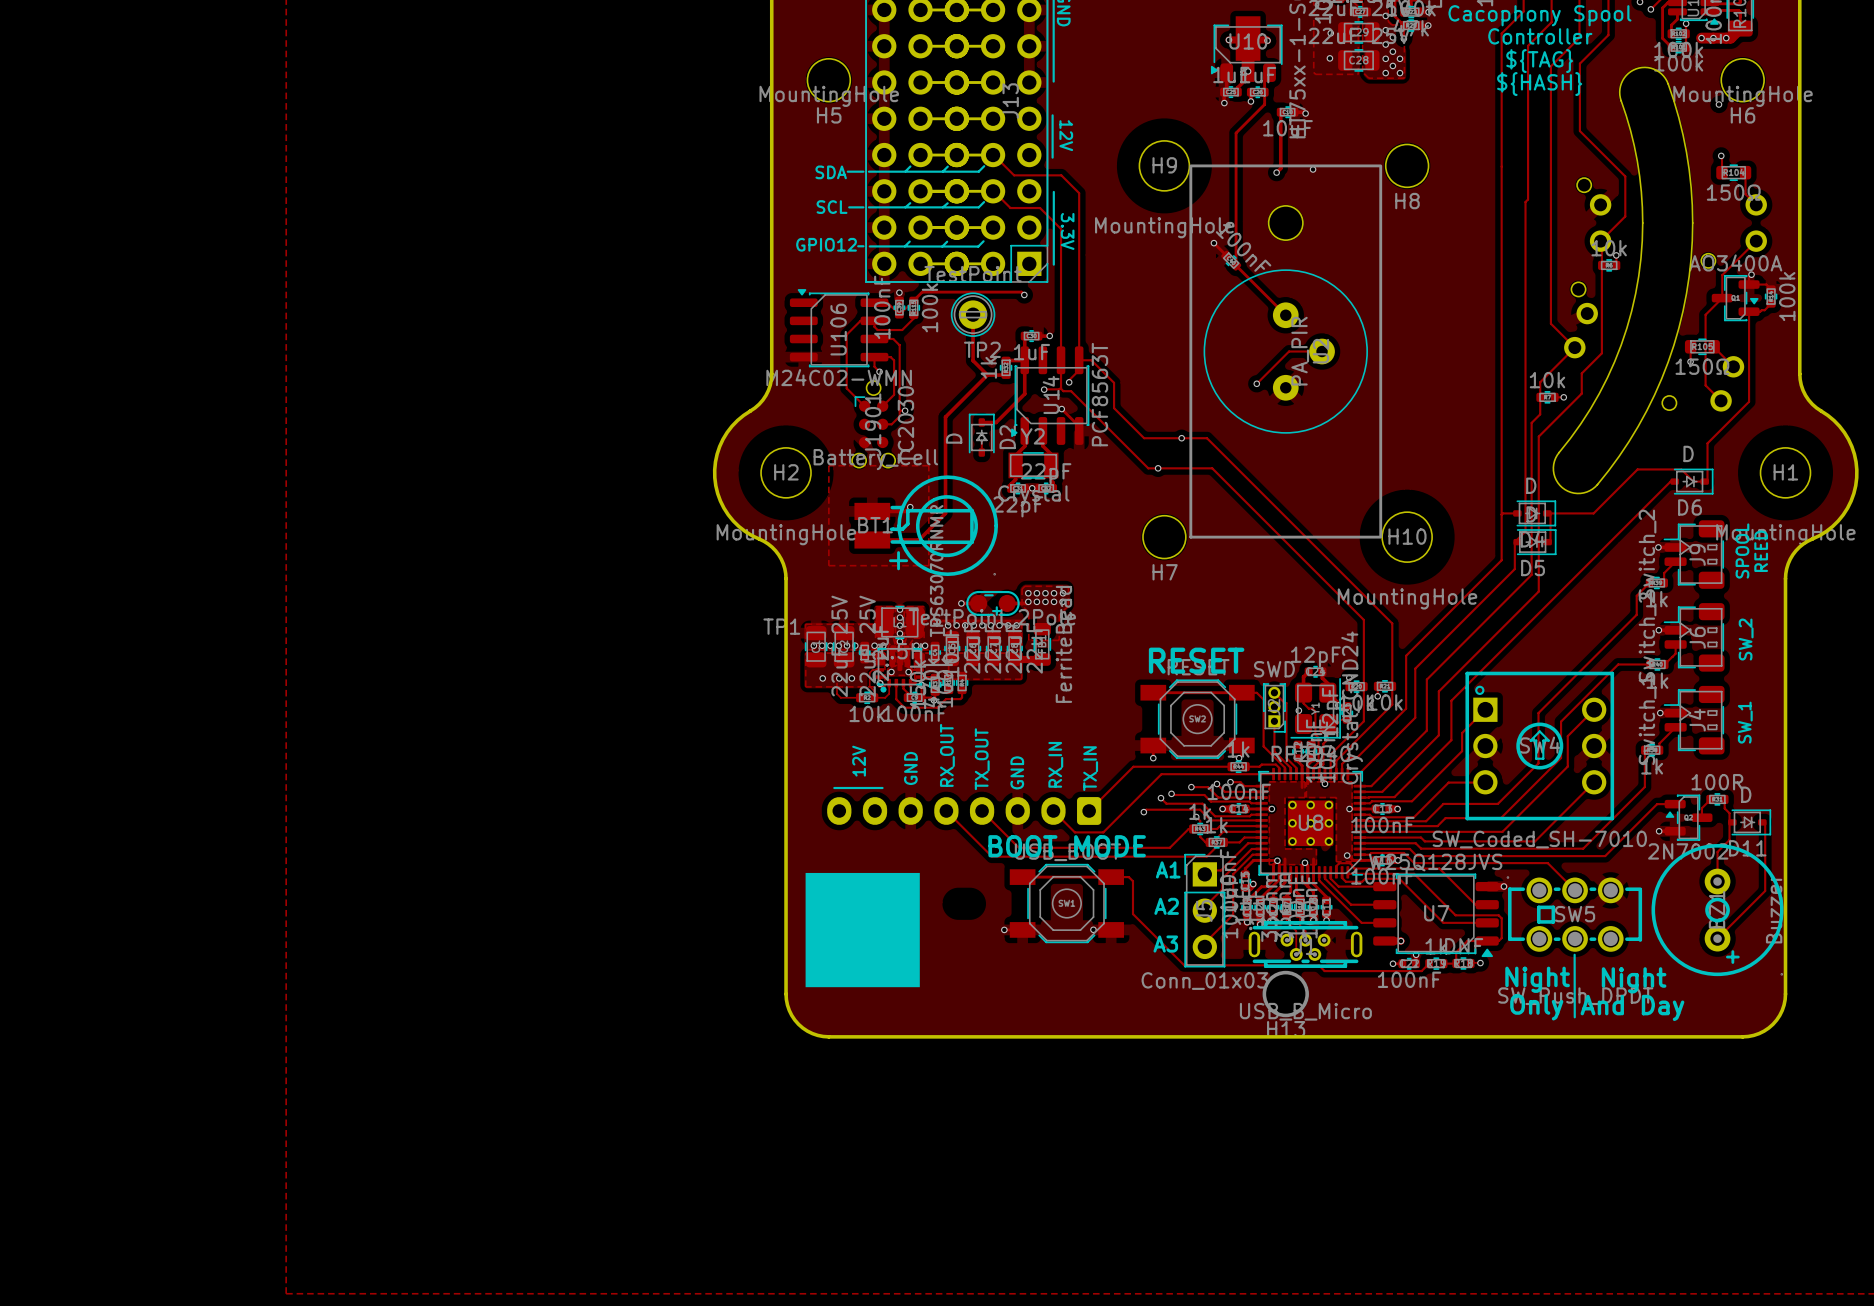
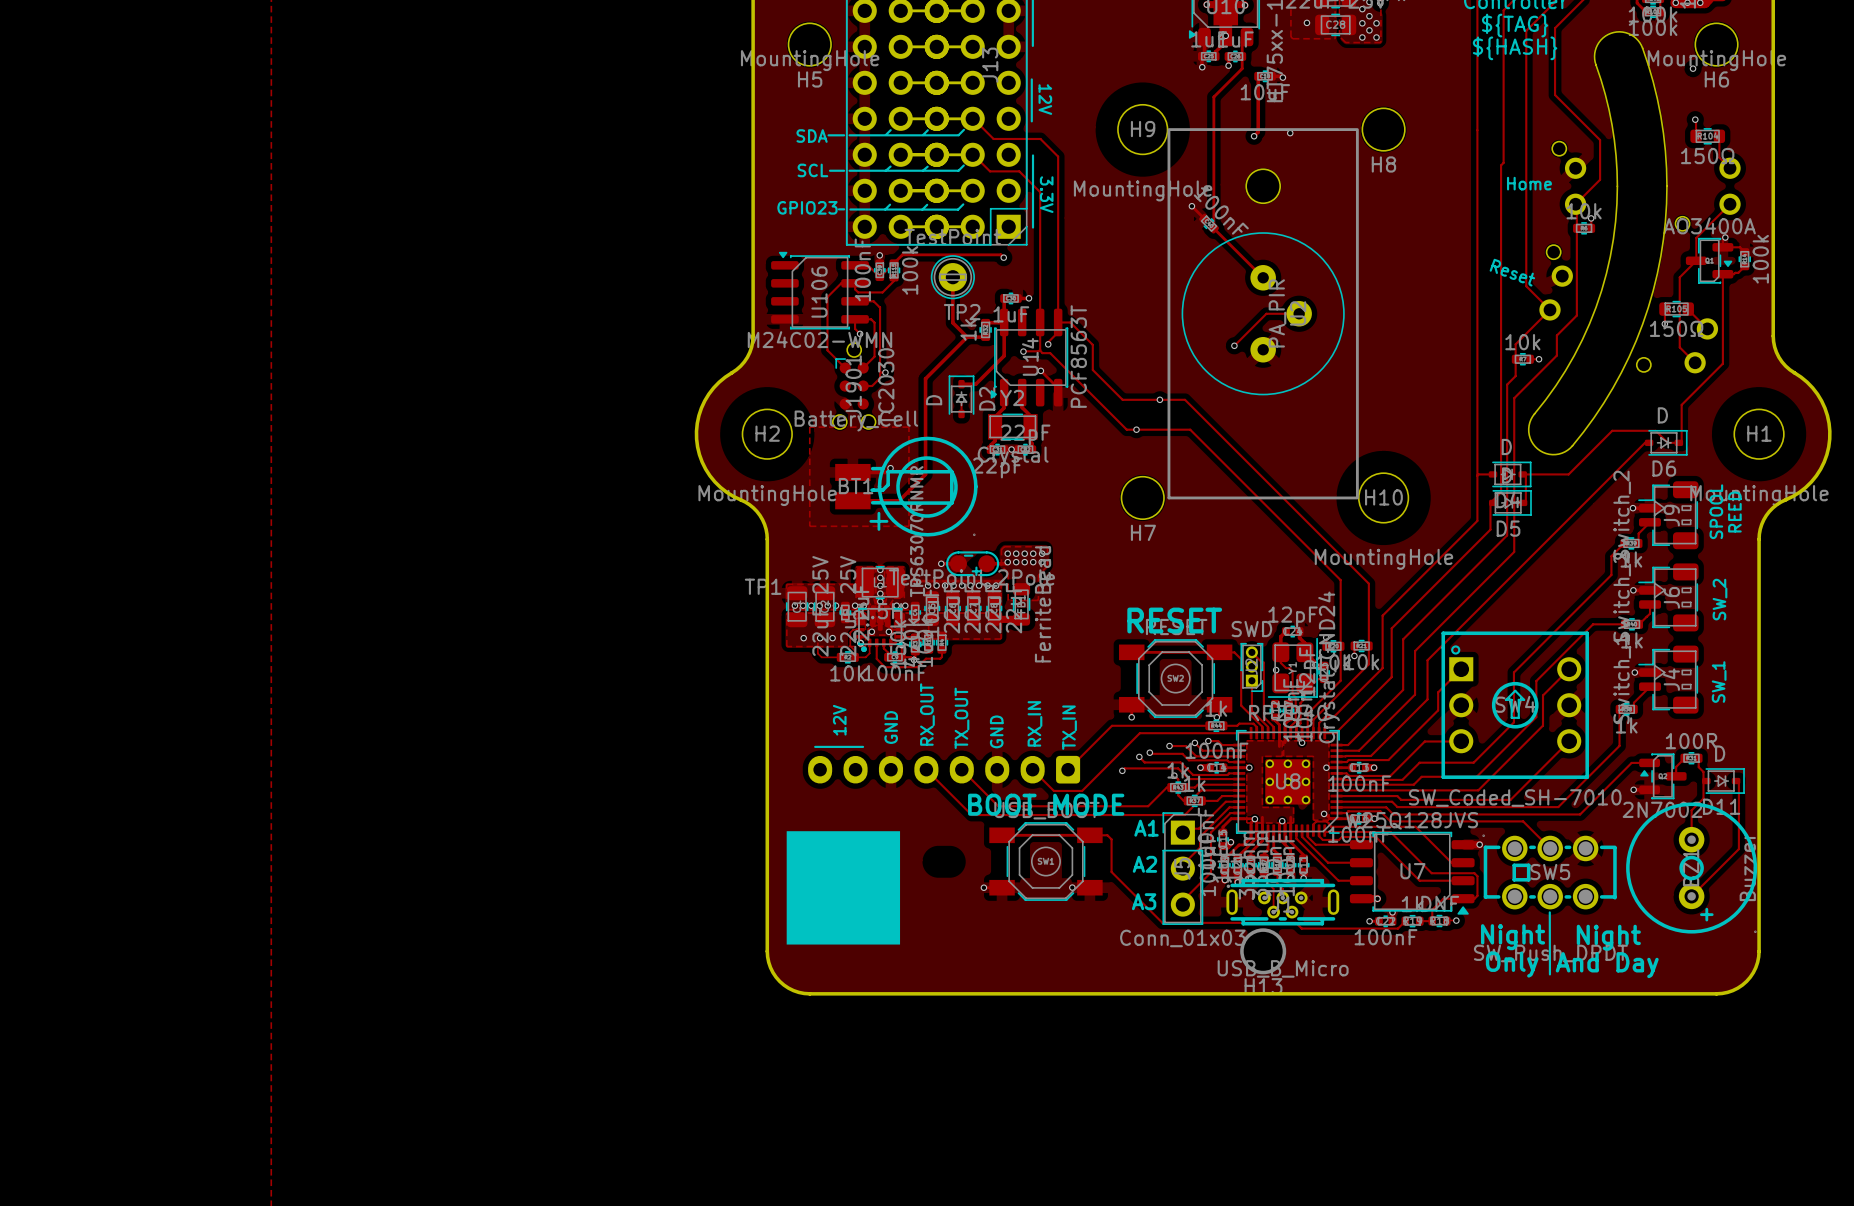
text: none -> Home (1529, 183)
text: GPIO12 (826, 244) -> GPIO23 (807, 207)
text: none -> Reset (1512, 272)

